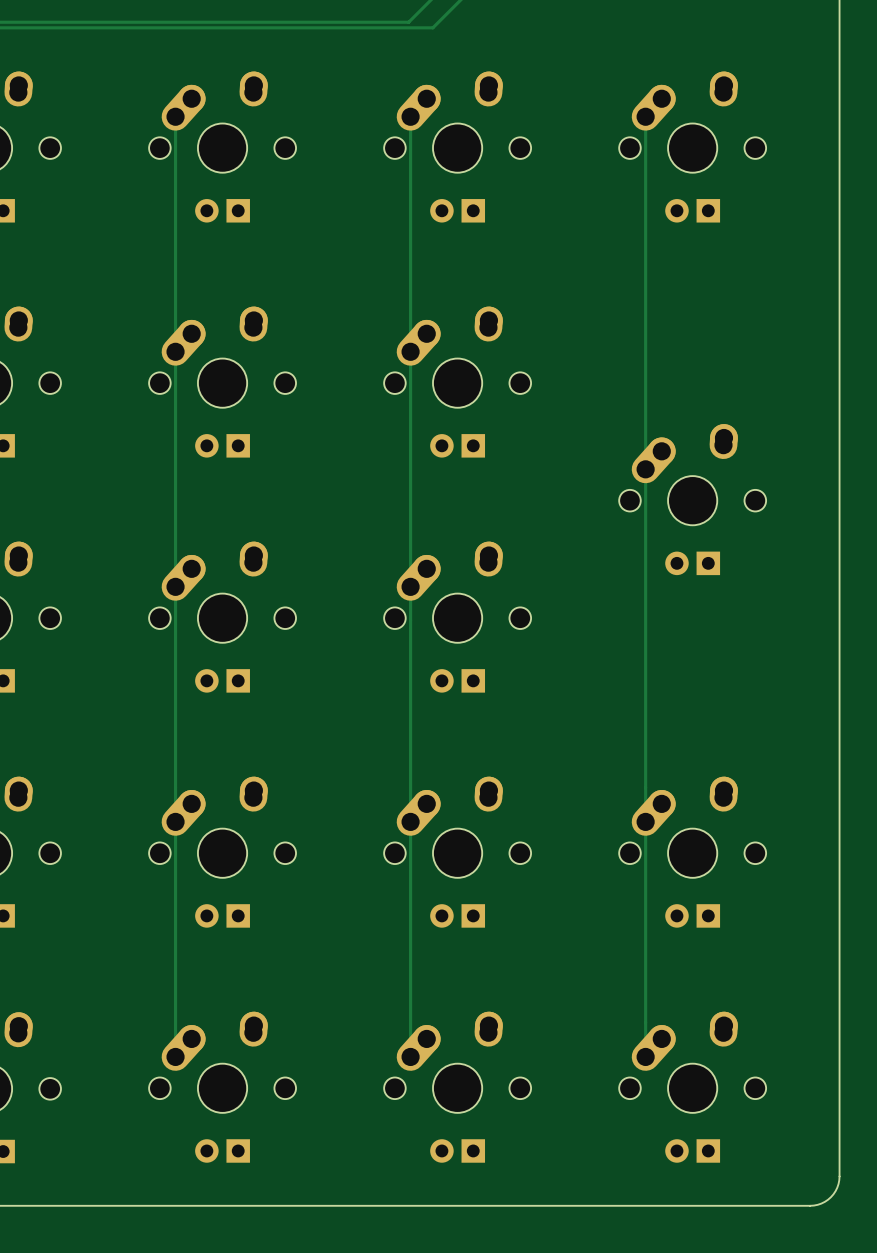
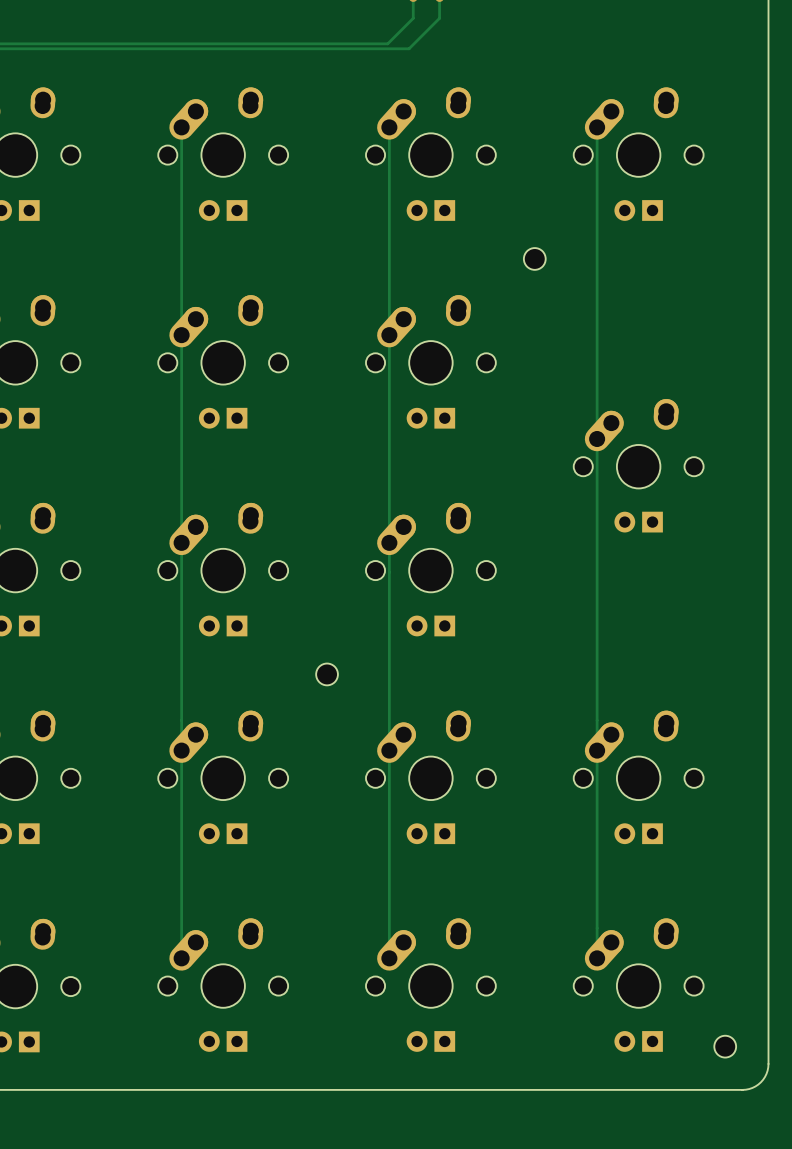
part: none -> (534, 258)
part: none -> (327, 674)
part: none -> (725, 1046)

